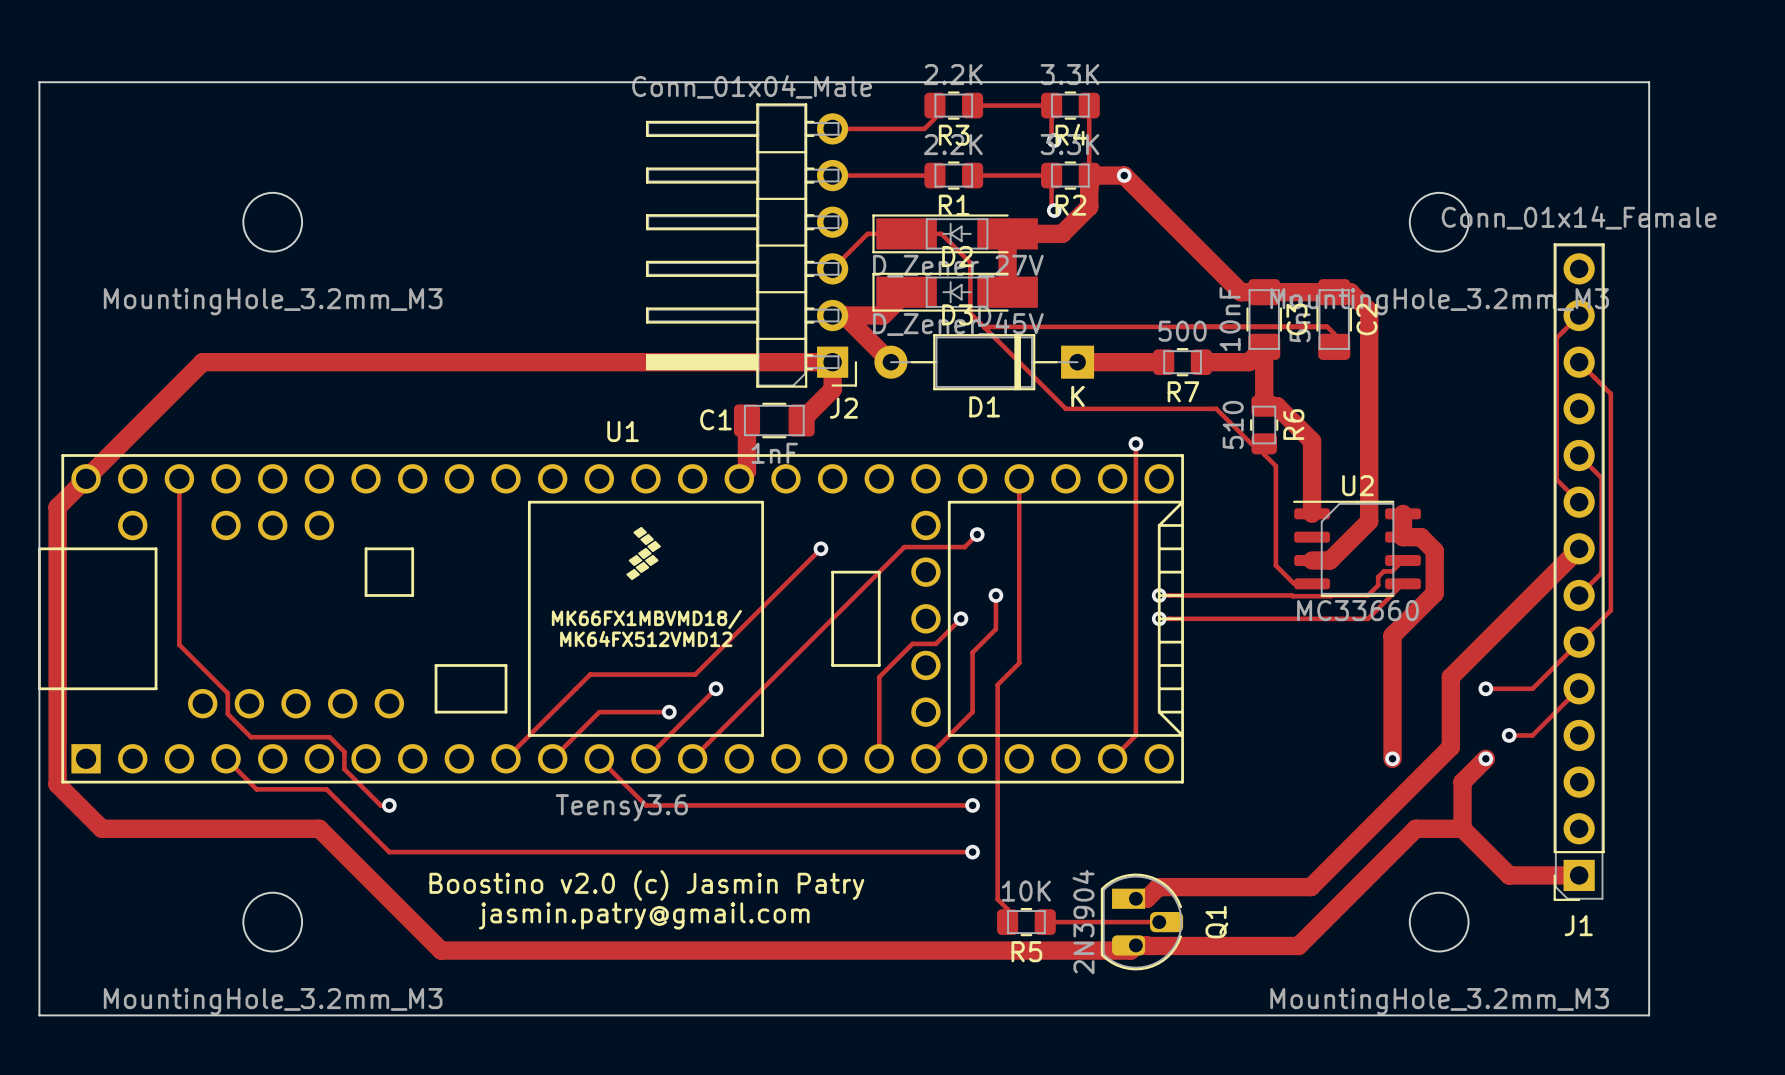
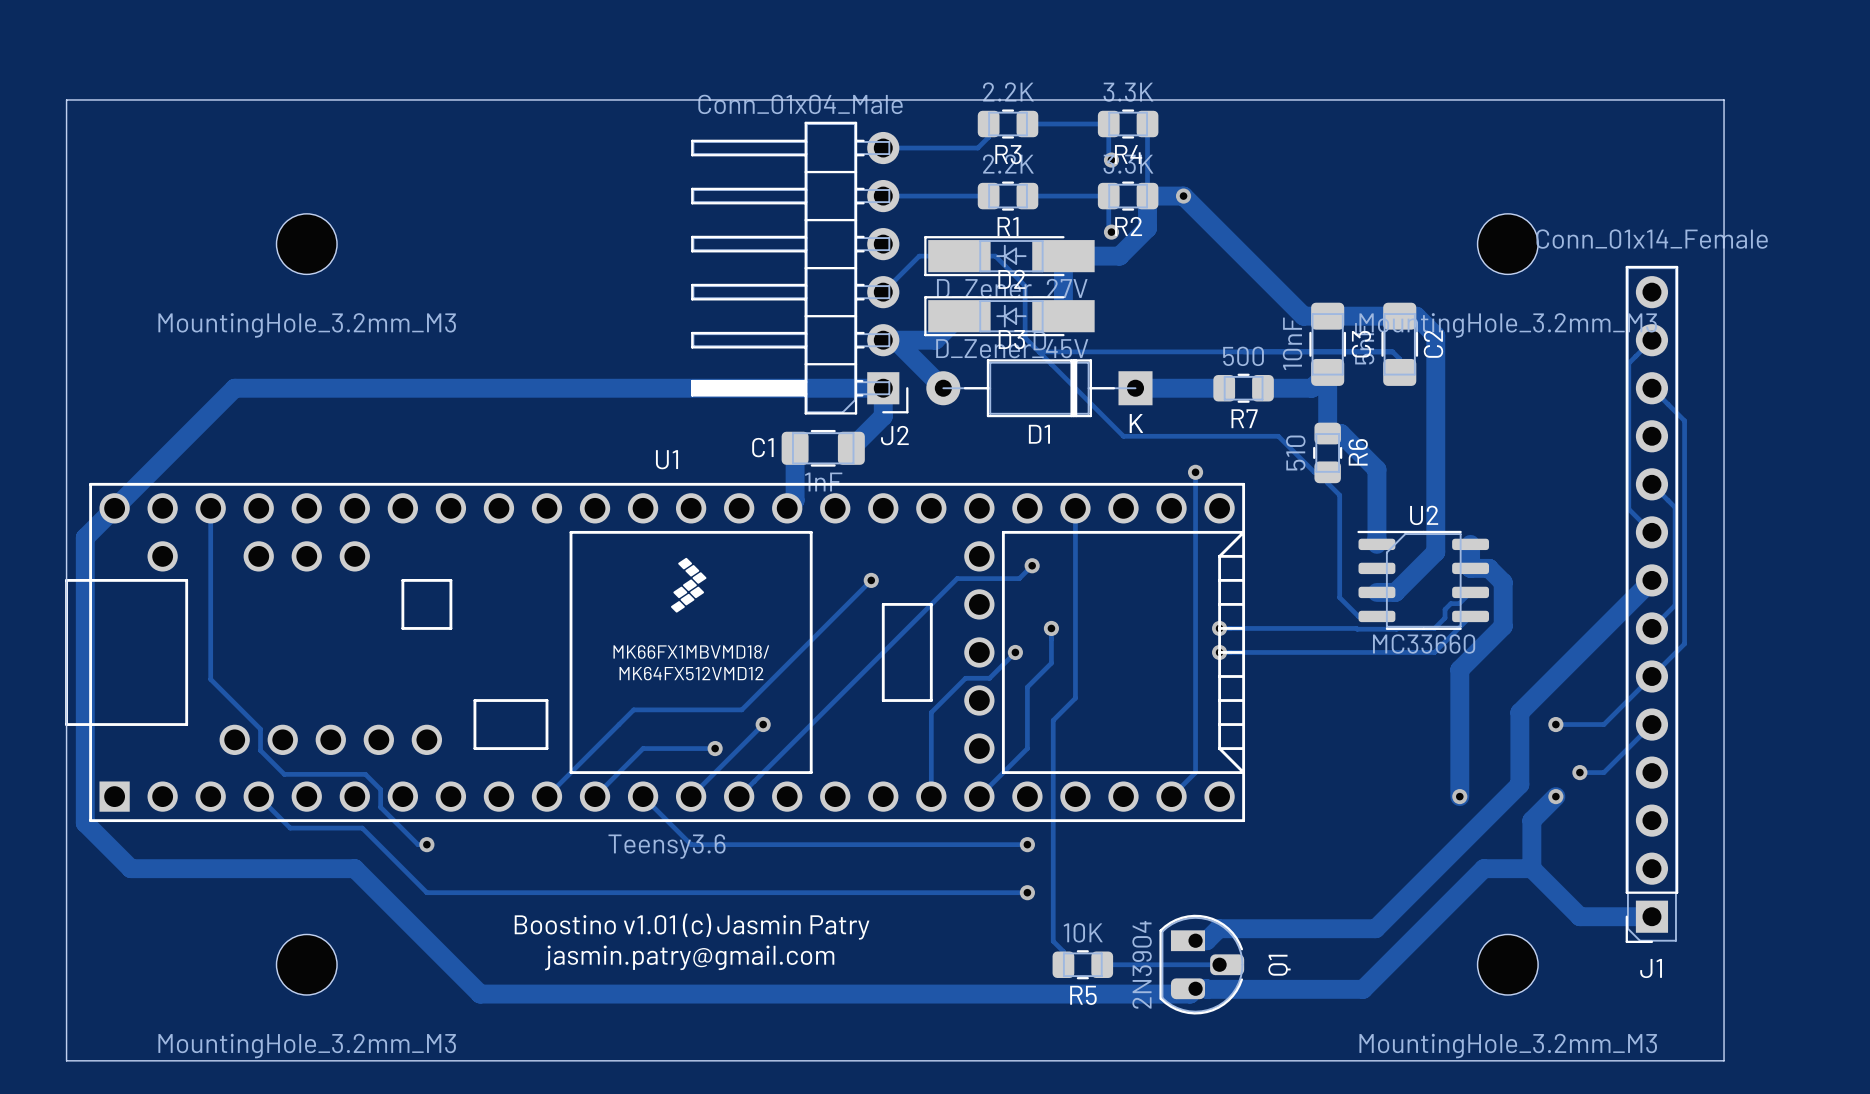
text: Boostino v2.0 (c) Jasmin Patry (646, 885) -> Boostino v1.01 (c) Jasmin Patry (692, 926)

